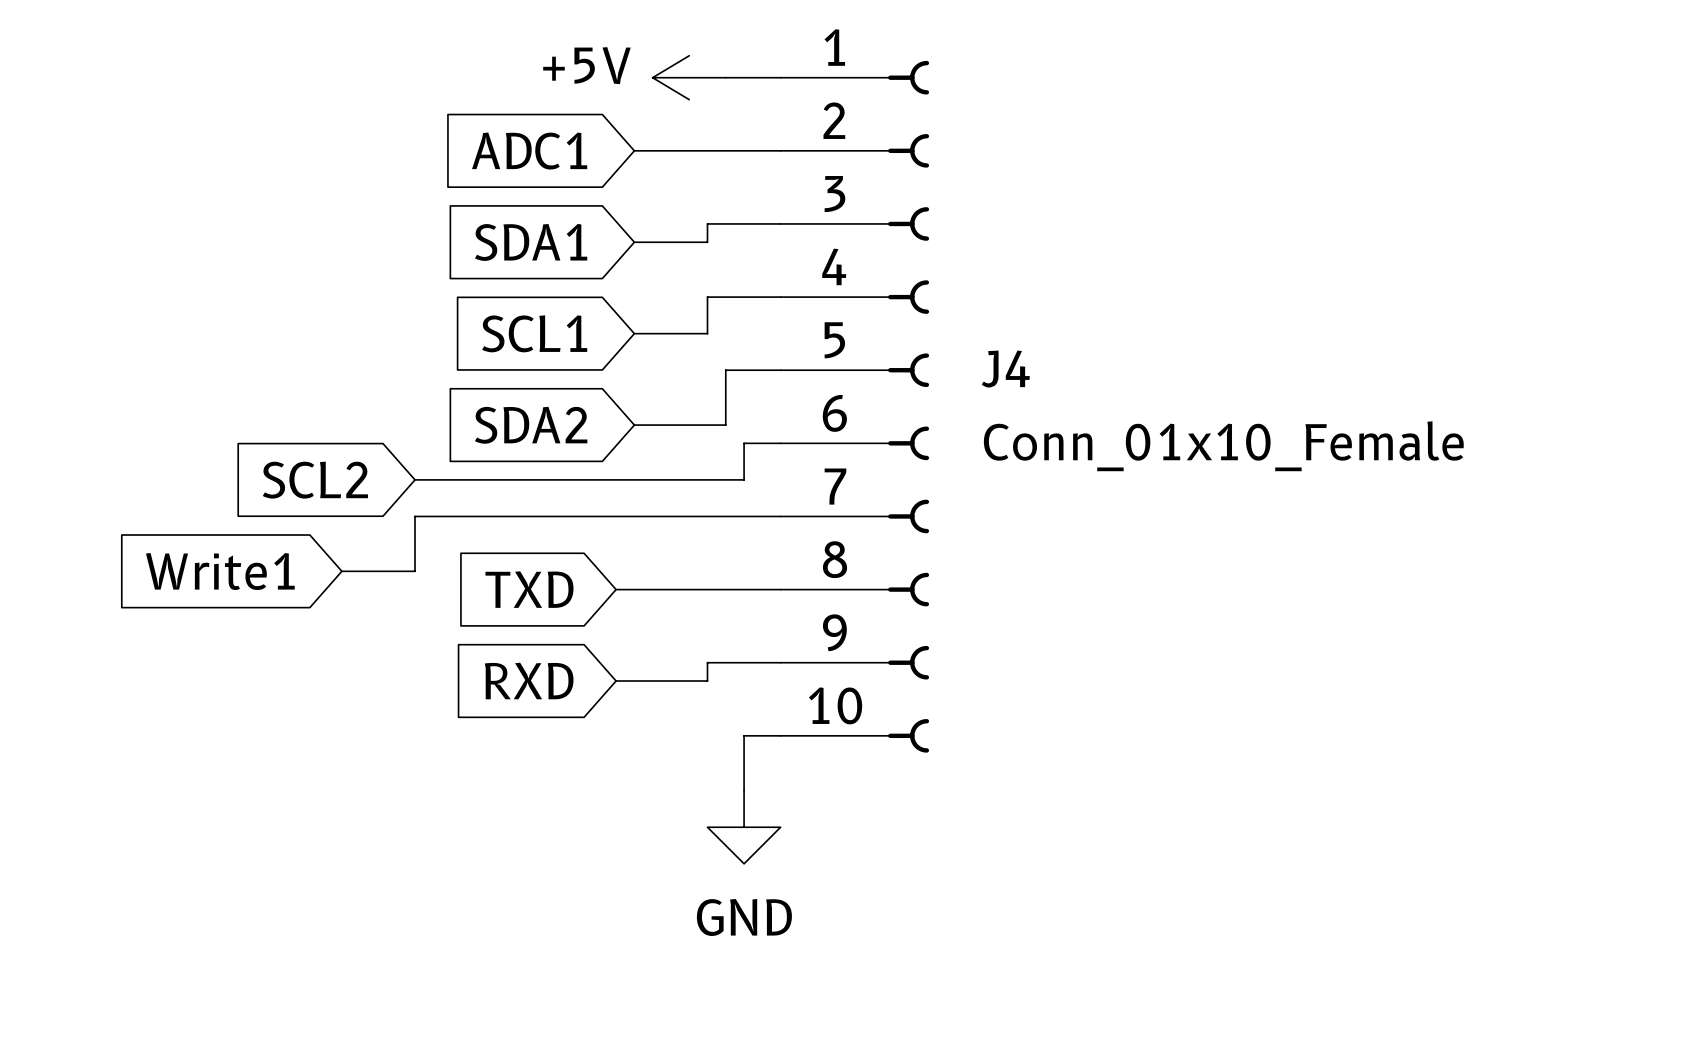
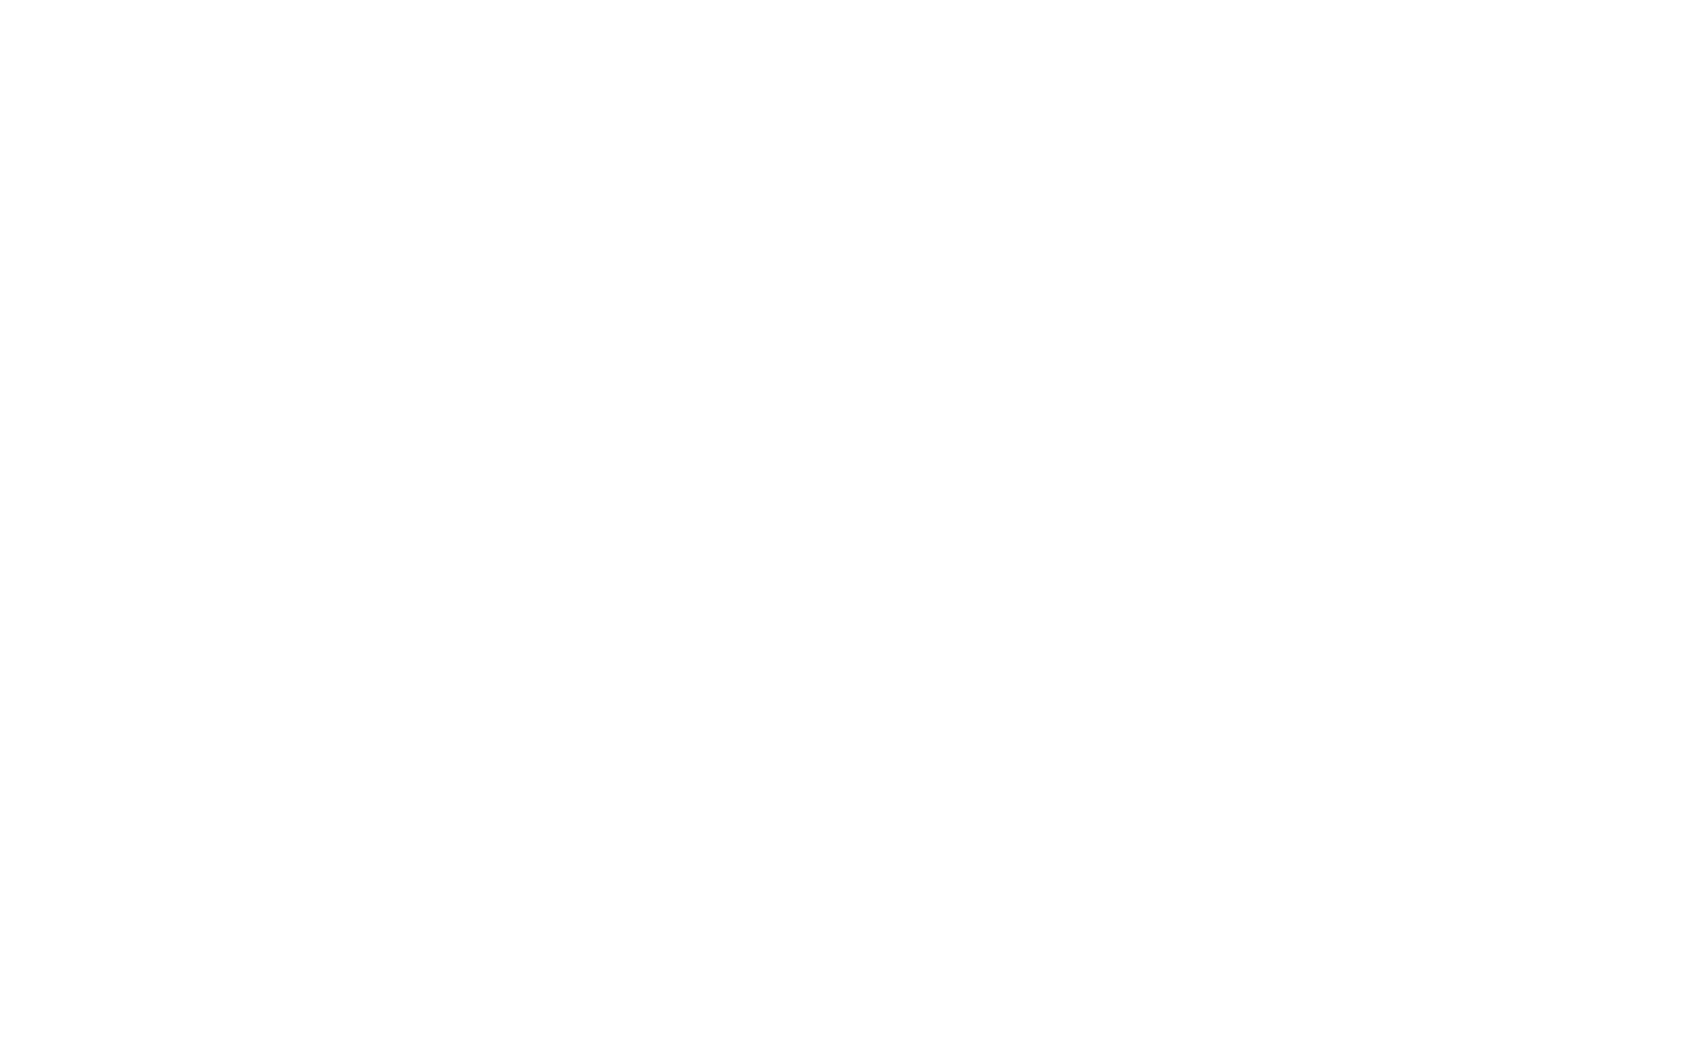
power symbol: +5V (689, 77) -> none
wire: (725, 77) (780, 77) -> none
wire: (634, 150) (780, 150) -> none
global label: ADC1 (529, 151) -> none
wire: (780, 223) (707, 223) (707, 242) (634, 242) -> none
global label: SDA1 (531, 242) -> none
wire: (780, 297) (707, 297) (707, 333) (634, 333) -> none
global label: SCL1 (534, 333) -> none
wire: (780, 370) (725, 370) (725, 425) (634, 425) -> none
J4: Conn_01x10_Female (854, 406) -> none
global label: SDA2 (531, 425) -> none
wire: (780, 443) (744, 443) (744, 479) (414, 479) -> none
global label: SCL2 (315, 480) -> none
wire: (780, 516) (414, 516) (414, 571) (341, 571) -> none
global label: Write1 (220, 571) -> none
global label: TXD (529, 589) -> none
wire: (616, 589) (780, 589) -> none
wire: (780, 662) (707, 662) (707, 681) (616, 681) -> none
global label: RXD (529, 681) -> none
wire: (780, 735) (744, 735) (744, 790) -> none
power symbol: GND (744, 827) -> none

